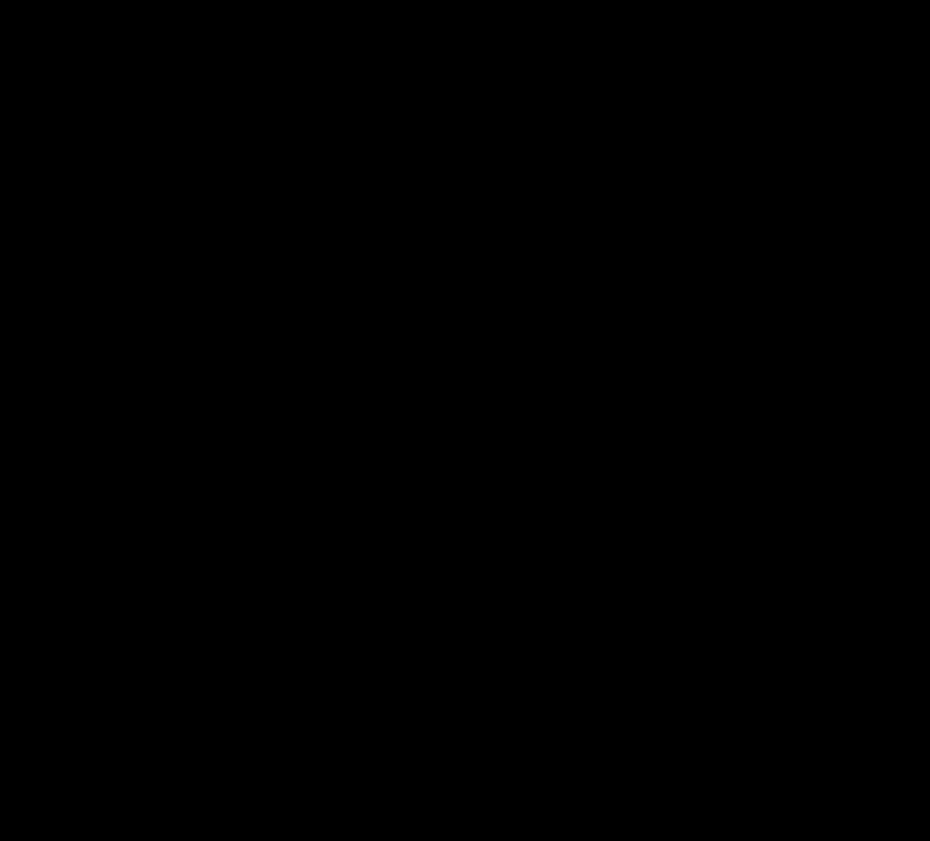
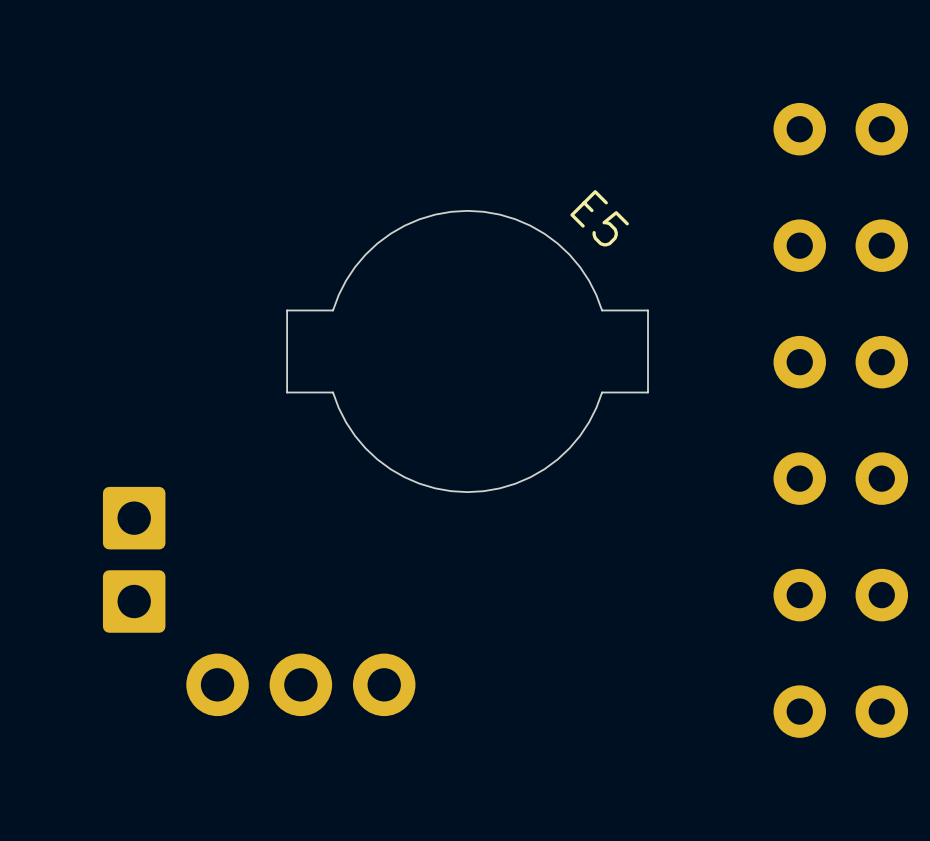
part: none -> (840, 129)
part: none -> (840, 245)
part: none -> (840, 362)
E5: none -> (375, 463)
part: none -> (840, 478)
part: none -> (840, 595)
part: none -> (840, 711)

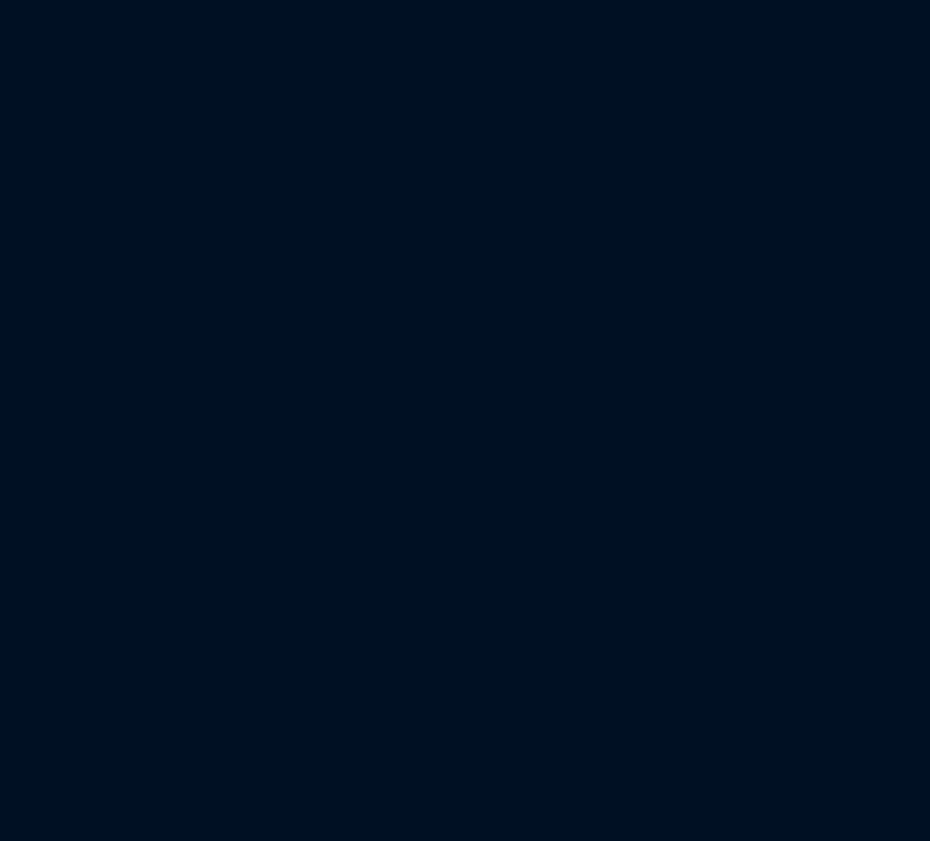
part: (840, 129) -> none
part: (840, 245) -> none
part: (840, 362) -> none
E5: (375, 463) -> none
part: (840, 478) -> none
part: (840, 595) -> none
part: (840, 711) -> none

